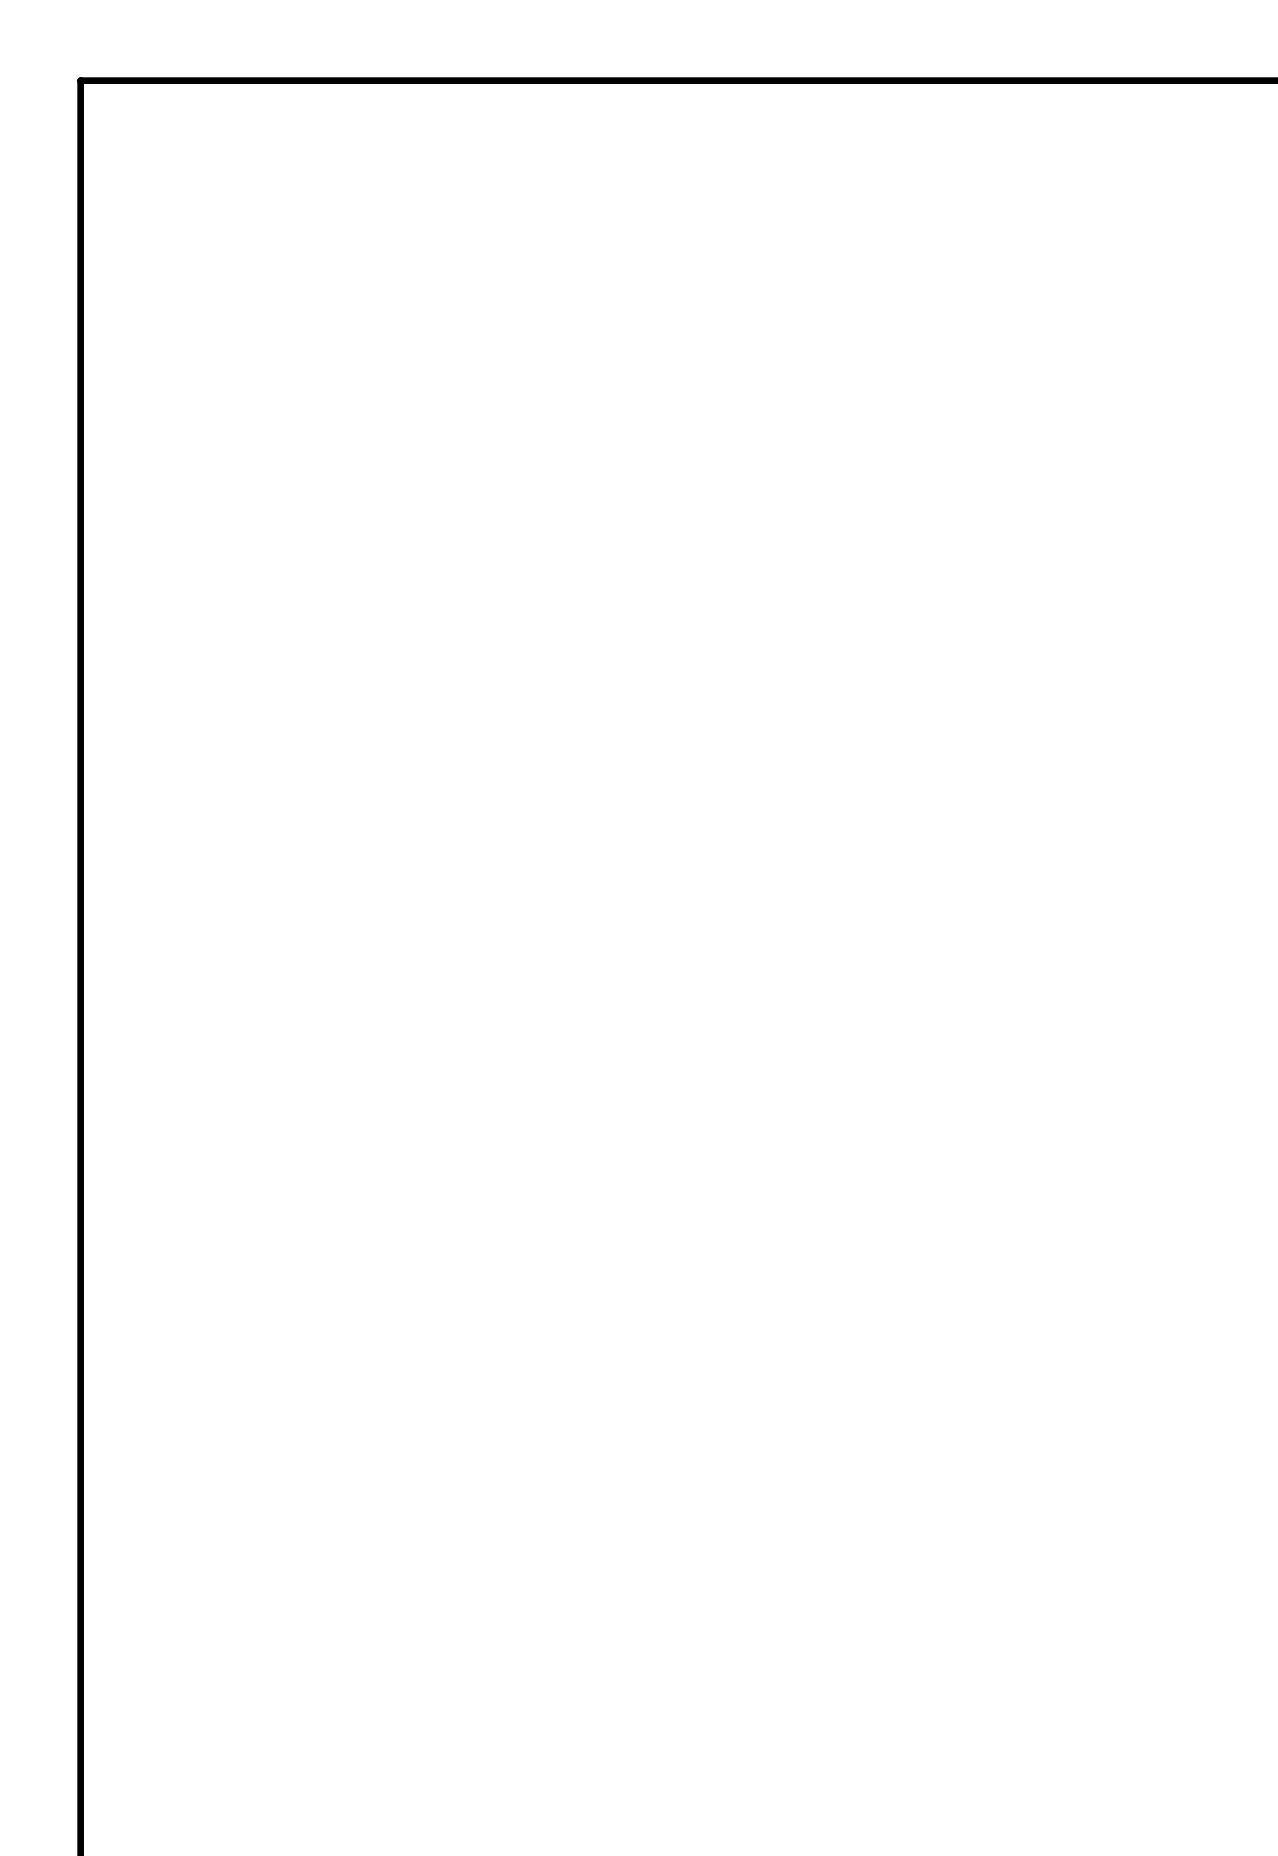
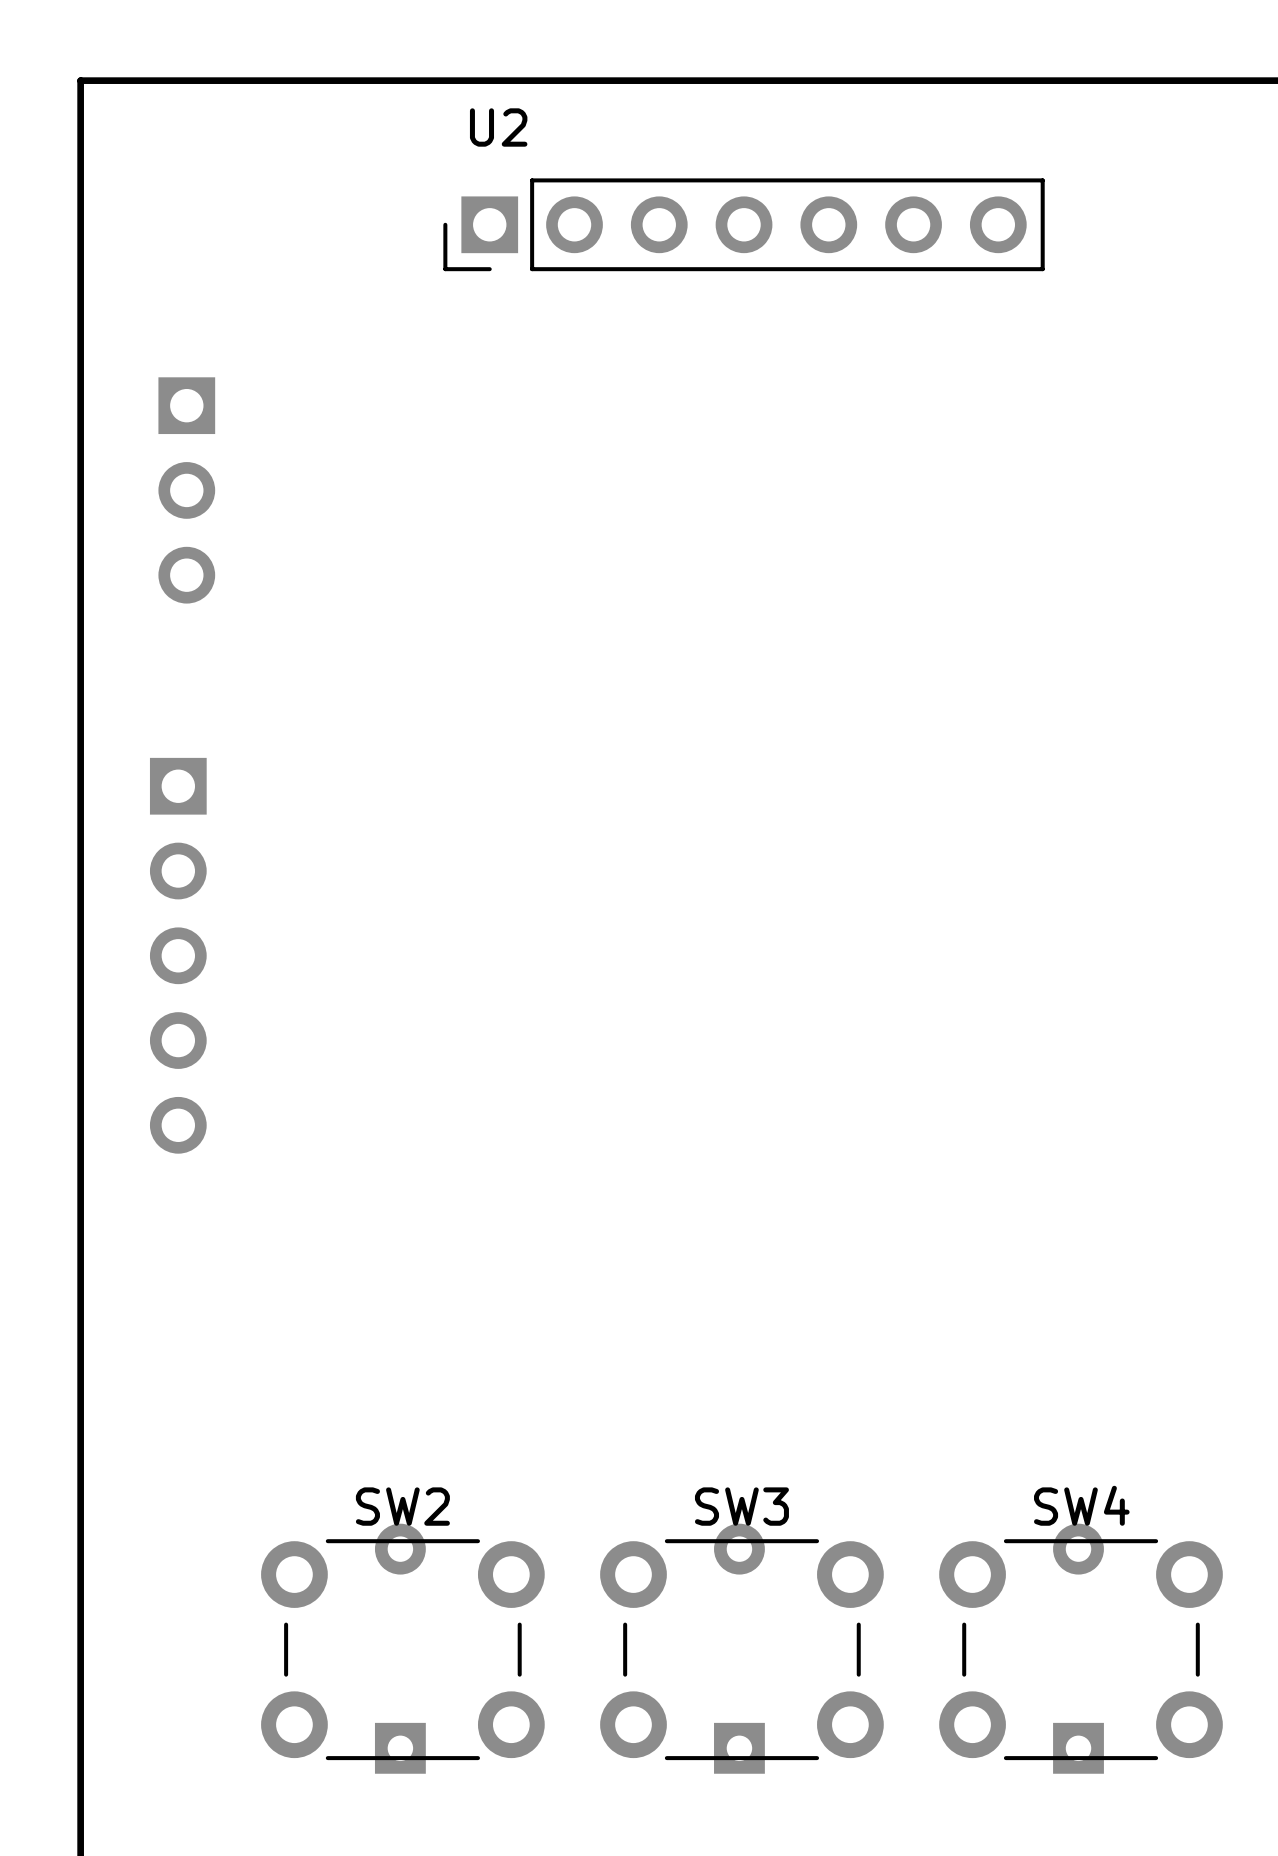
U2: none -> (744, 224)
part: none -> (186, 490)
part: none -> (178, 955)
SW2: none -> (402, 1648)
SW3: none -> (741, 1648)
SW4: none -> (1081, 1648)

